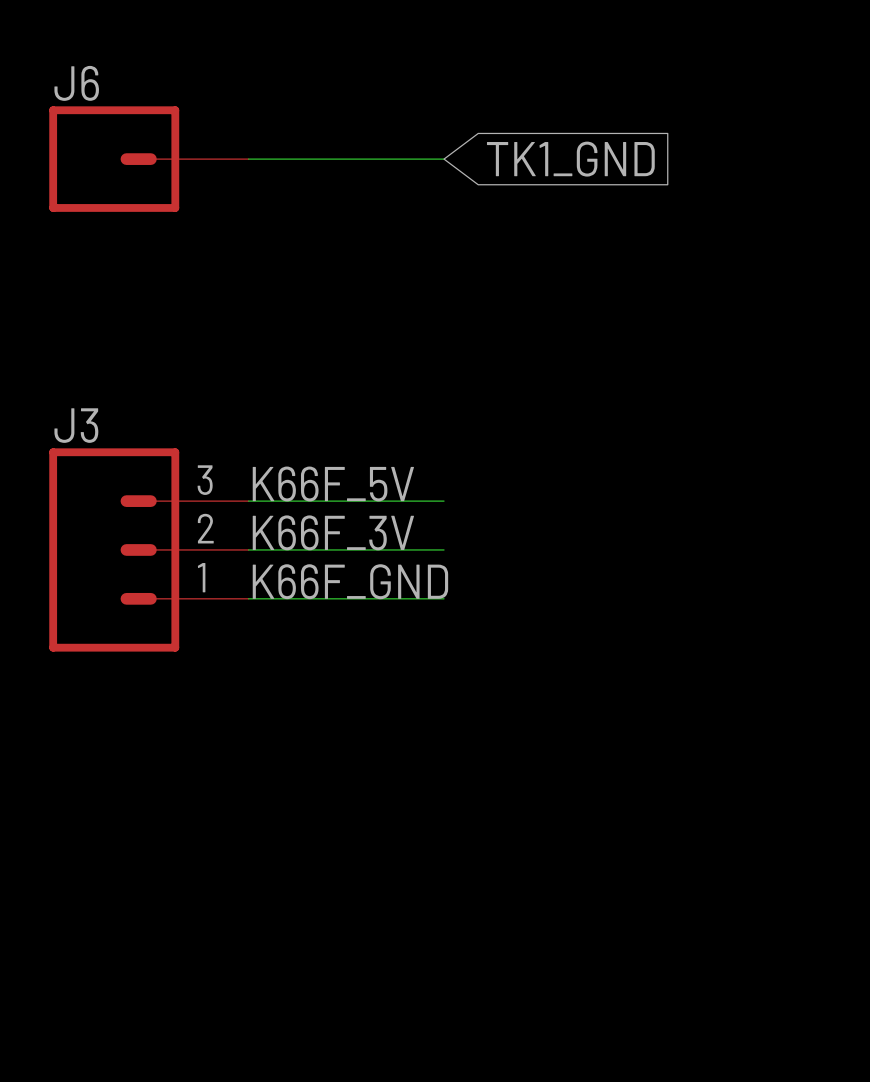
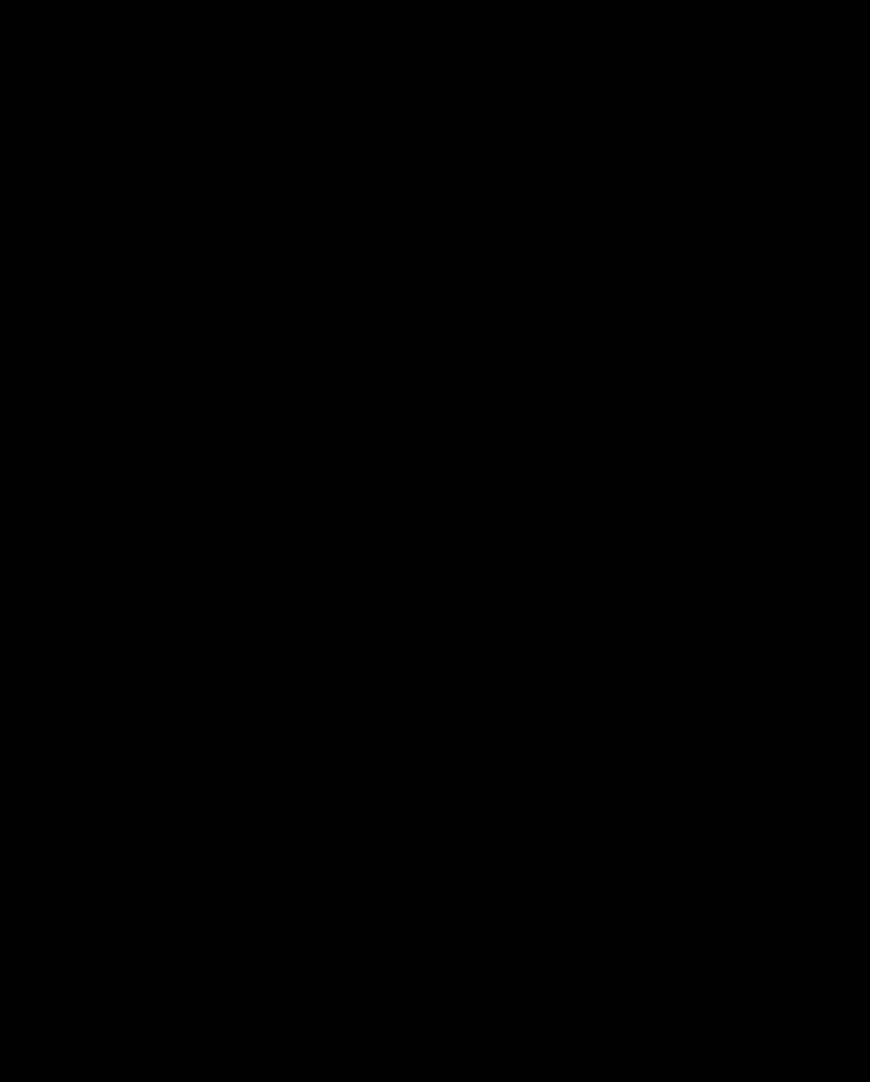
J6: (148, 159) -> none
wire: (248, 159) (444, 159) -> none
global label: TK1_GND (570, 159) -> none
label: K66F_5V (333, 483) -> none
wire: (248, 501) (444, 501) -> none
label: K66F_3V (333, 532) -> none
J3: (148, 549) -> none
wire: (248, 549) (444, 549) -> none
label: K66F_GND (350, 581) -> none
wire: (248, 598) (444, 598) -> none

